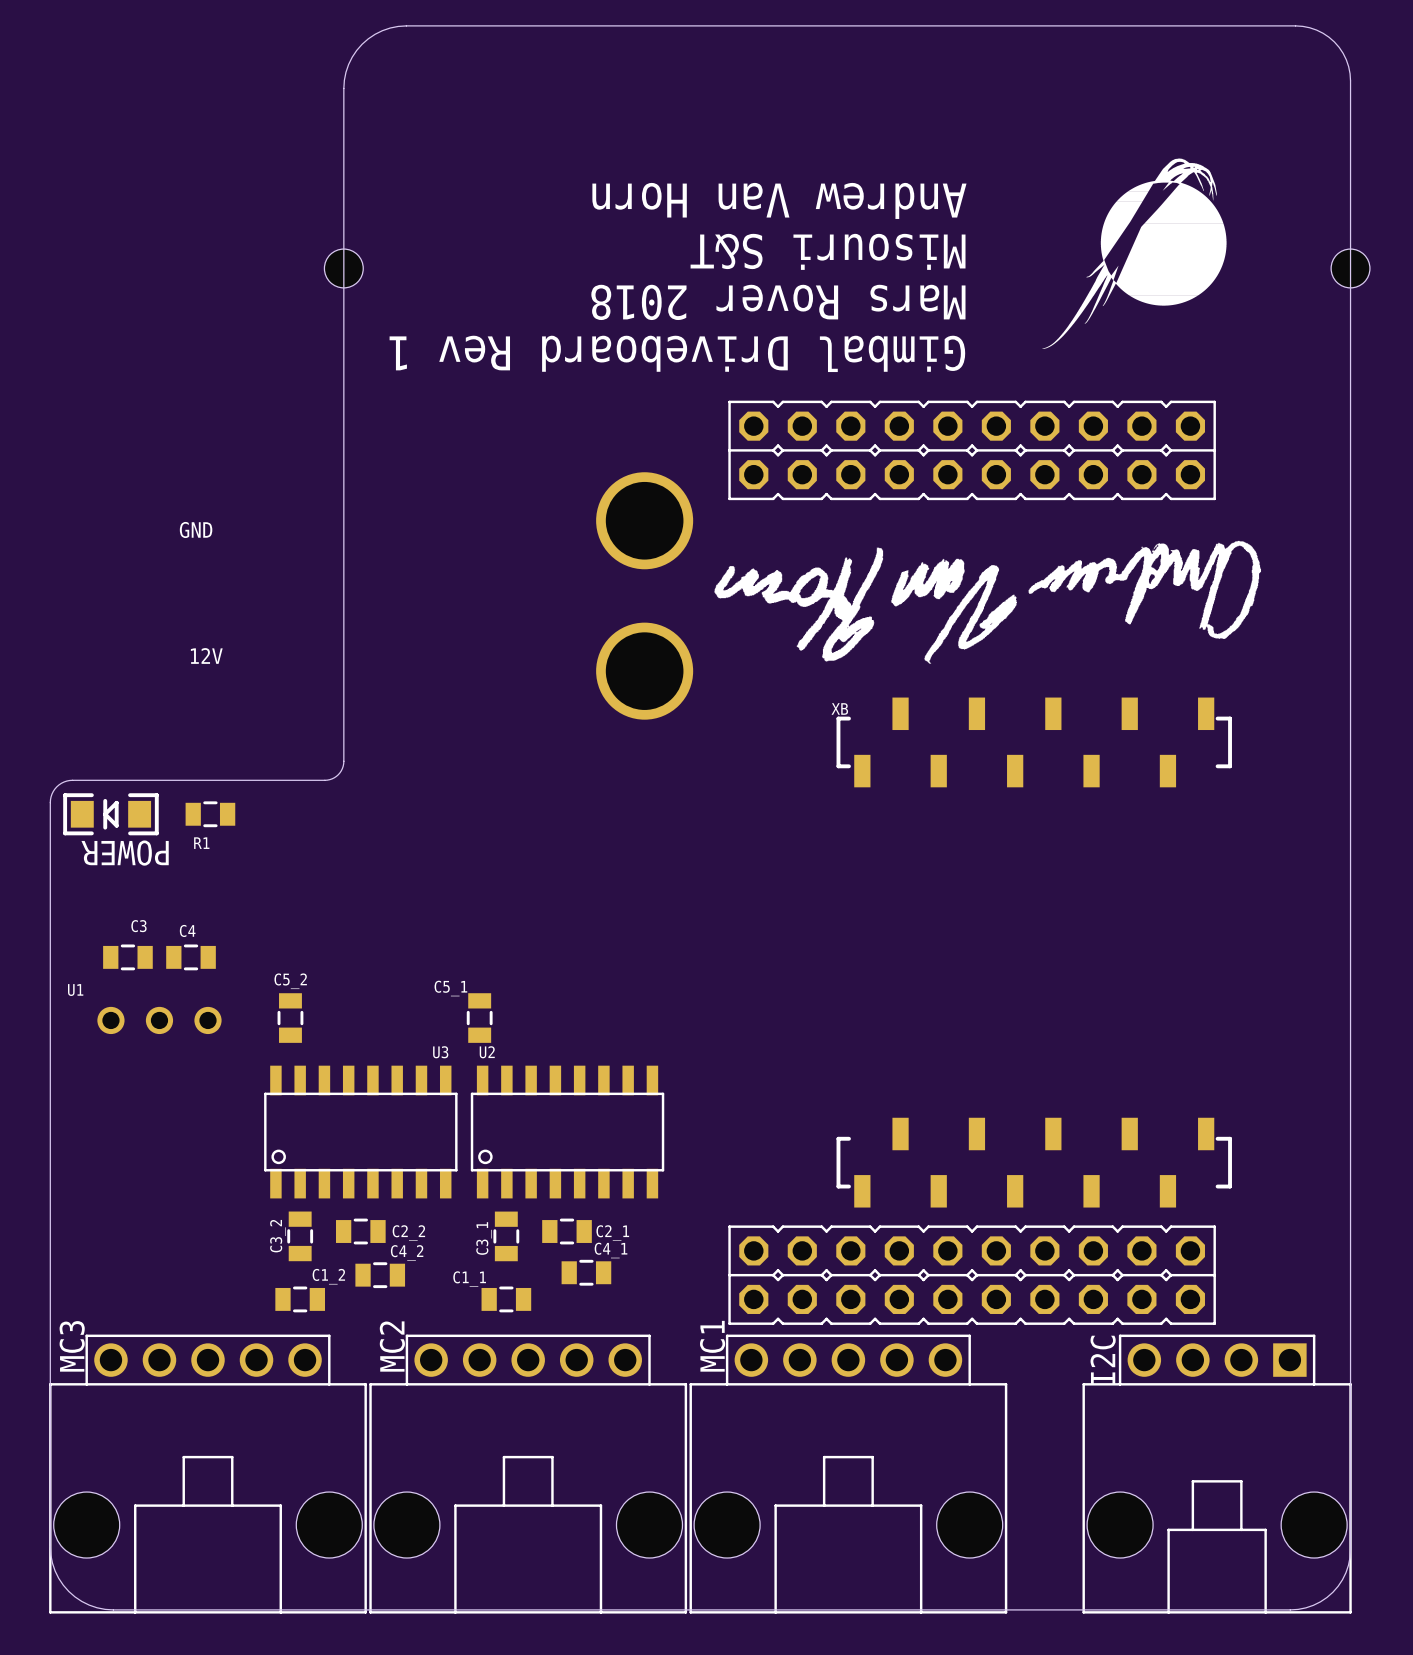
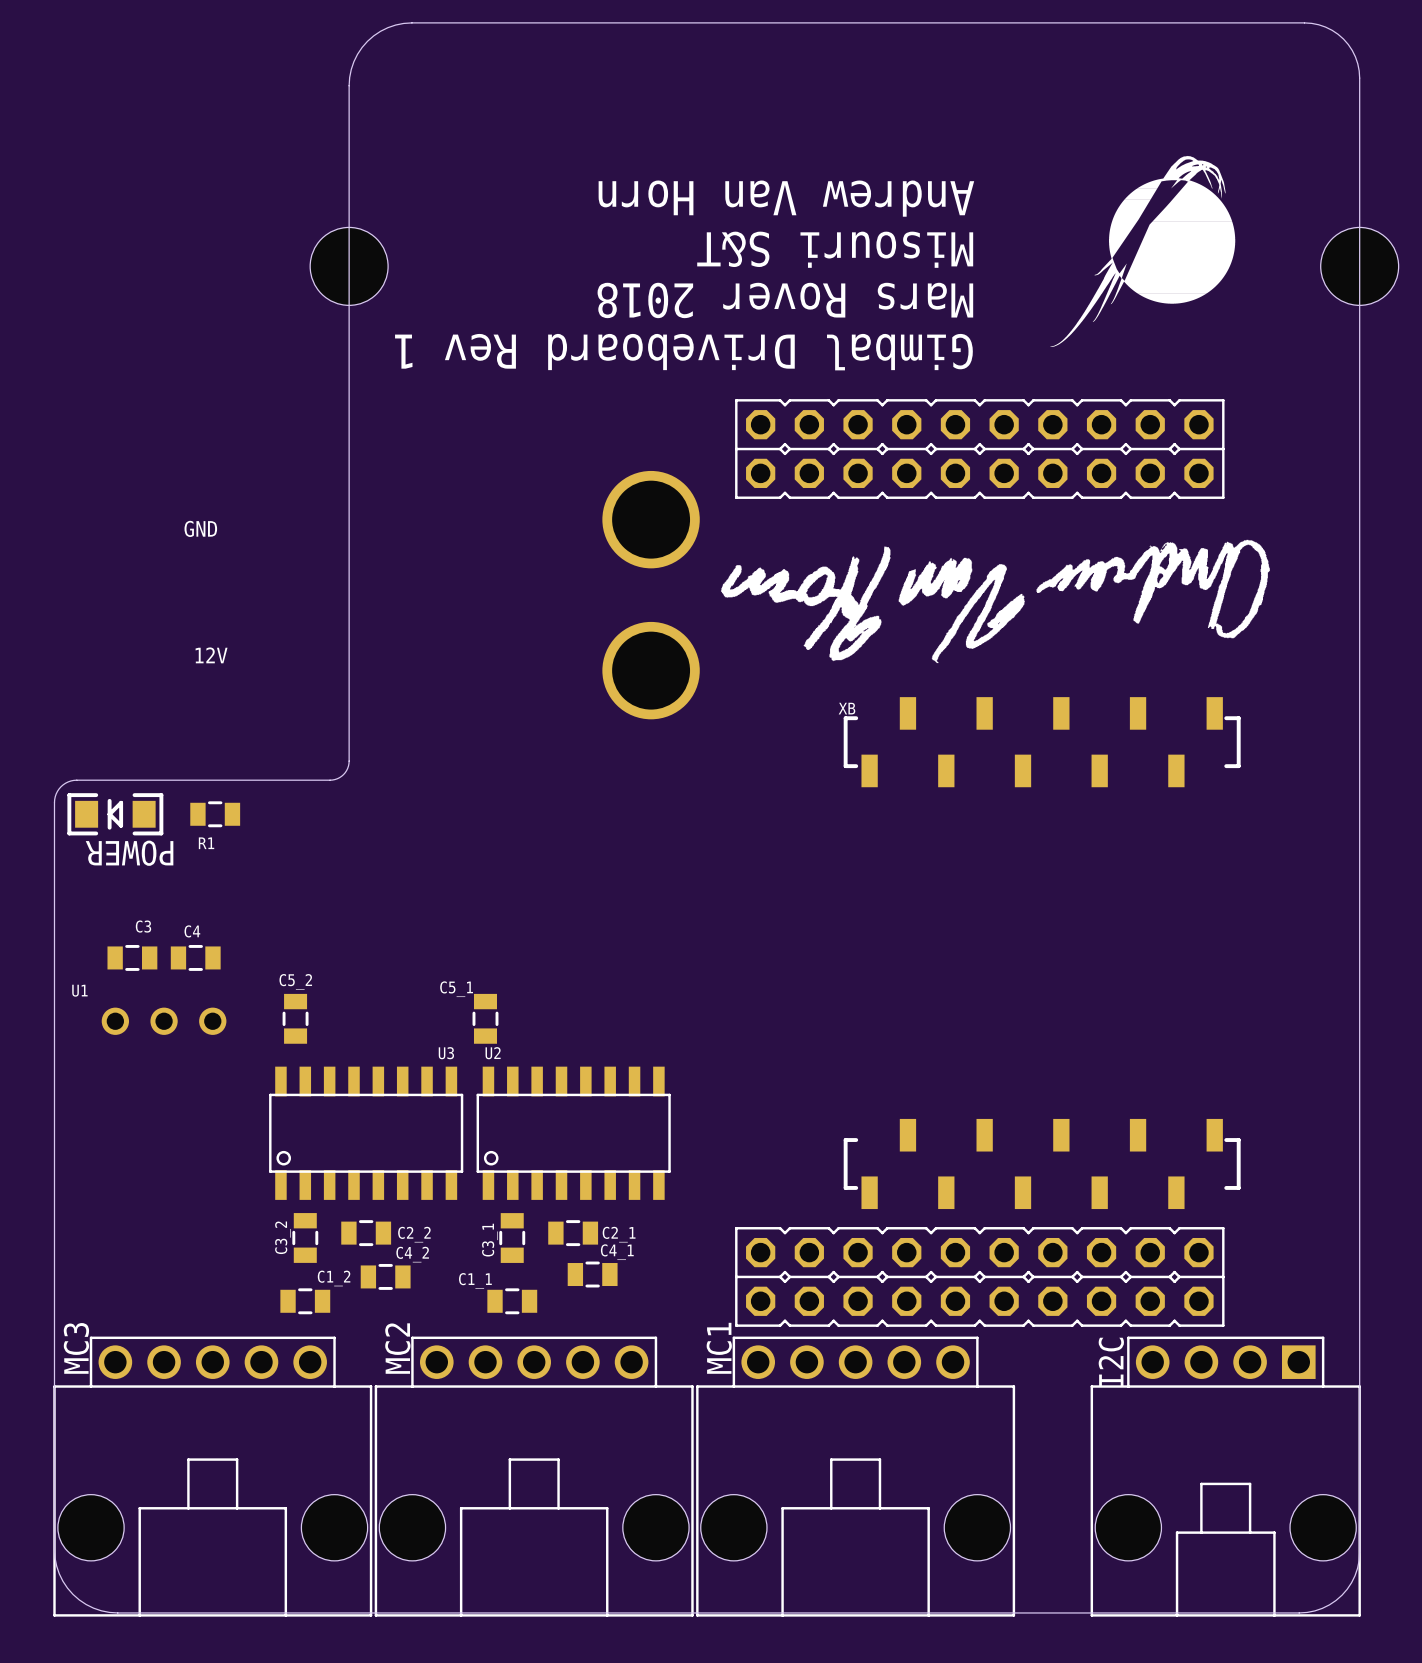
hole size: [324, 249, 364, 288] -> [310, 227, 389, 306]
hole size: [1331, 249, 1370, 288] -> [1320, 227, 1399, 306]

